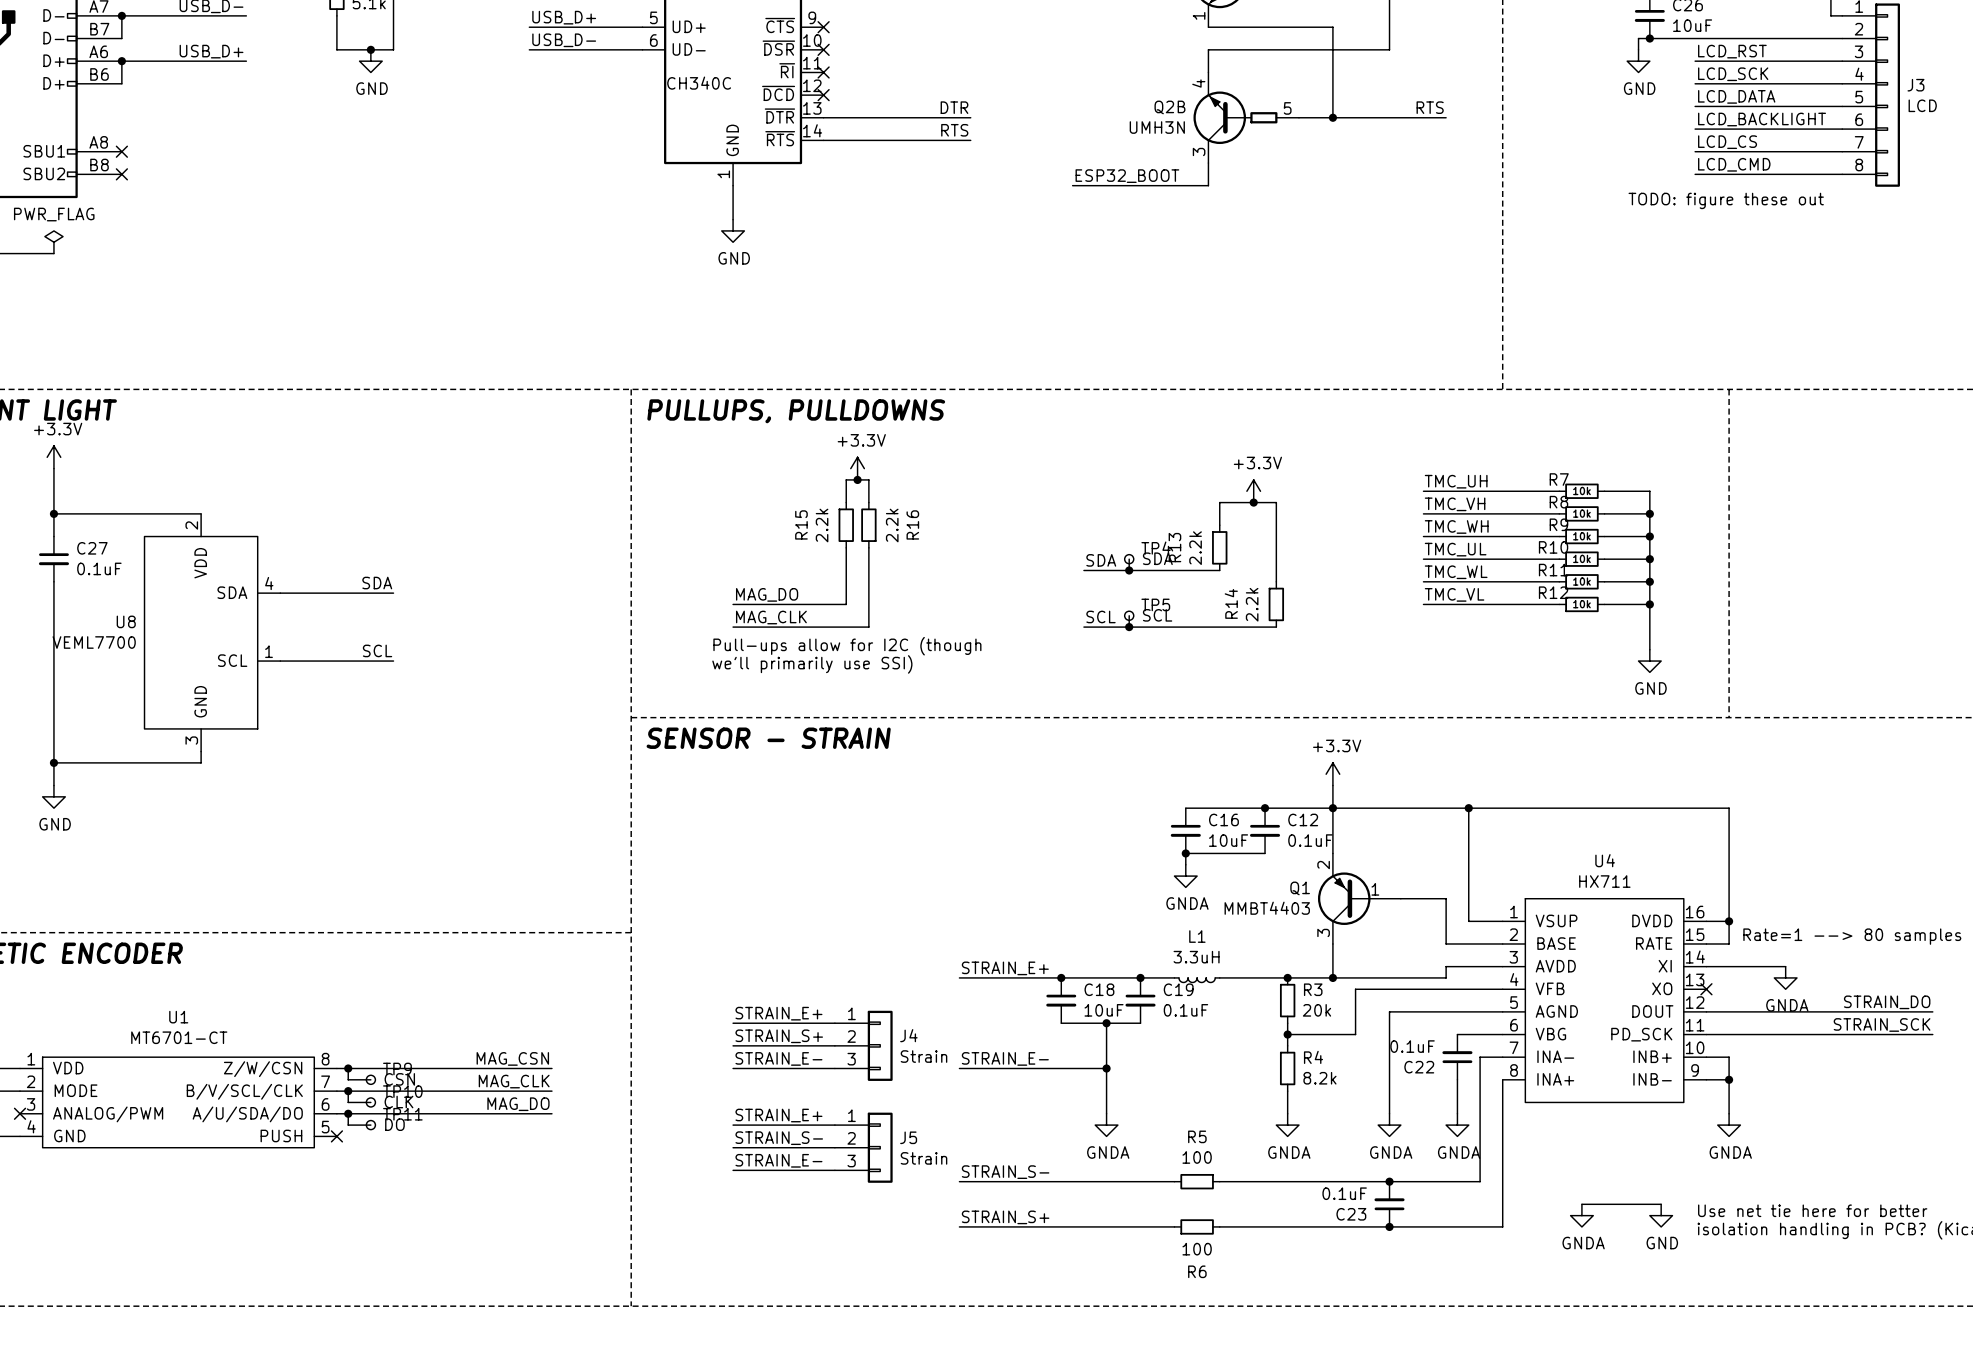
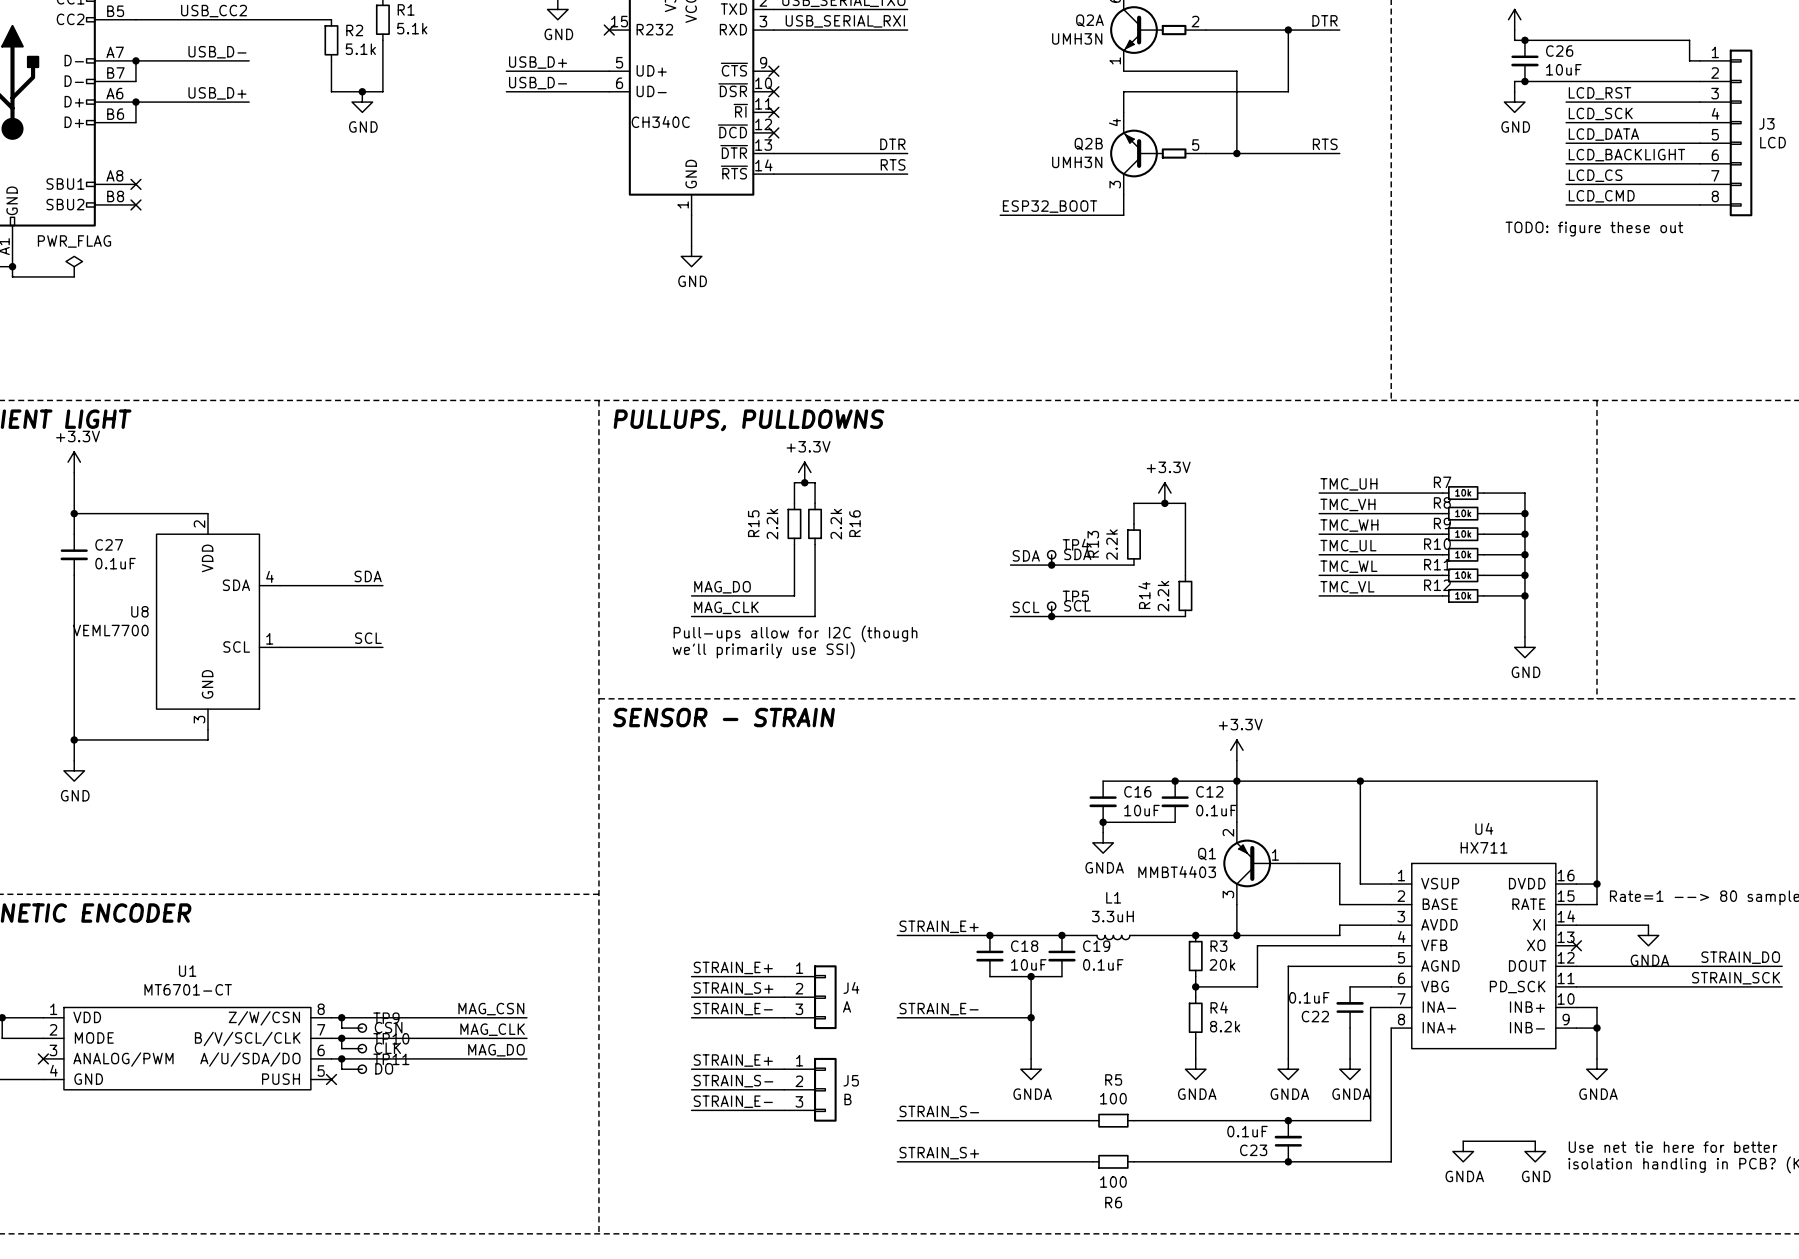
J4 value: Strain (923, 1056) -> A (847, 1006)
J5 value: Strain (923, 1158) -> B (847, 1099)

